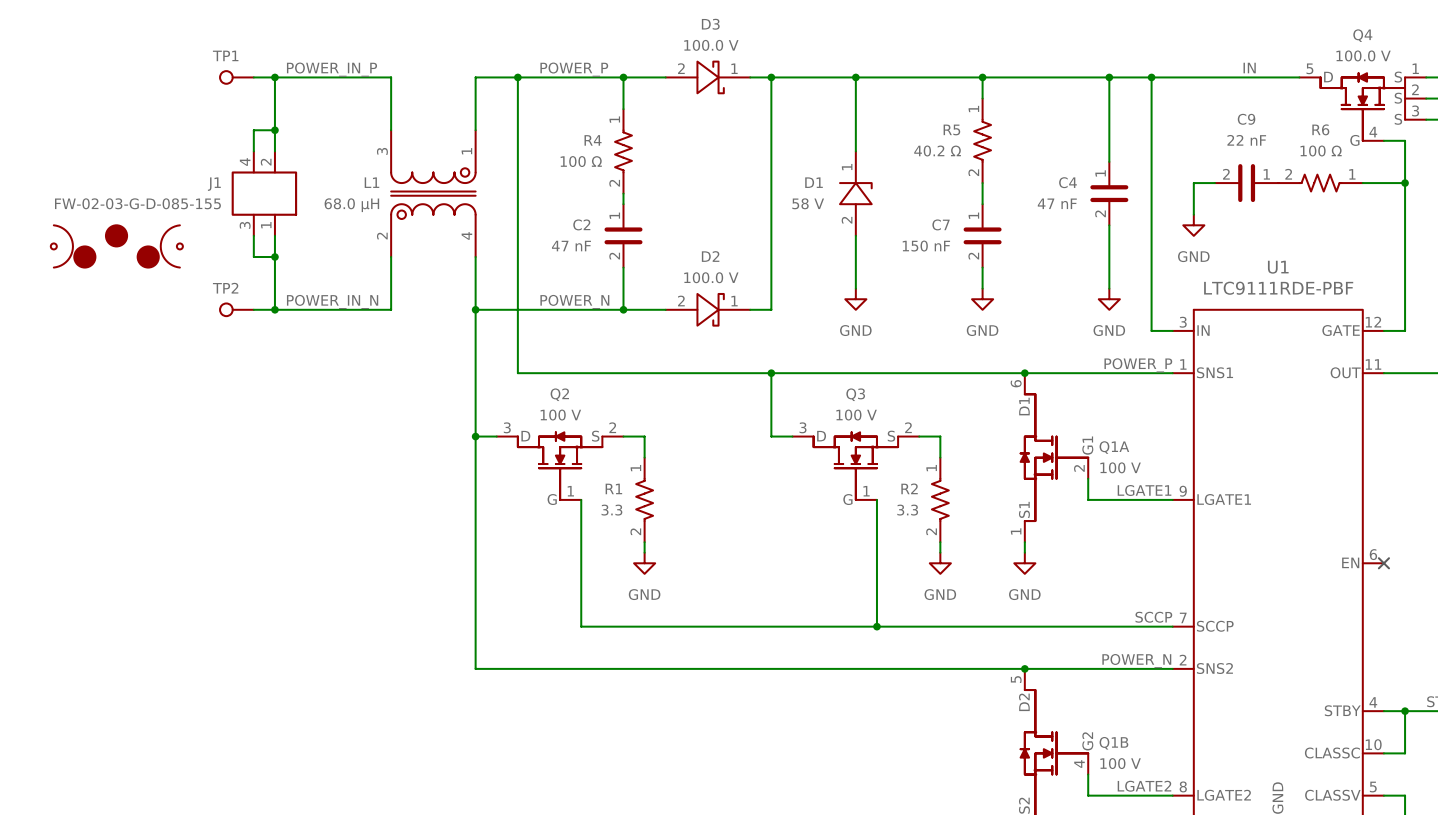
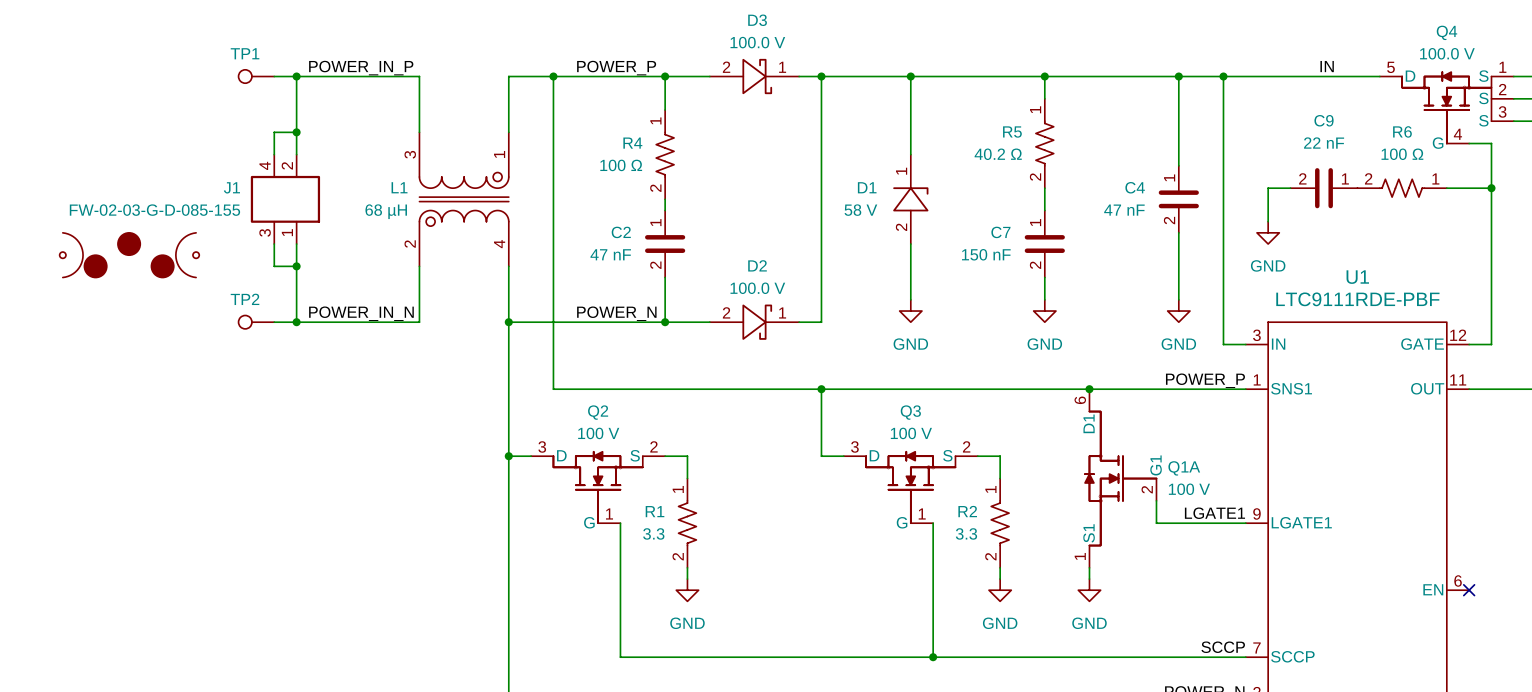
L1 value: 68.0 µH (351, 205) -> 68 µH (386, 211)

